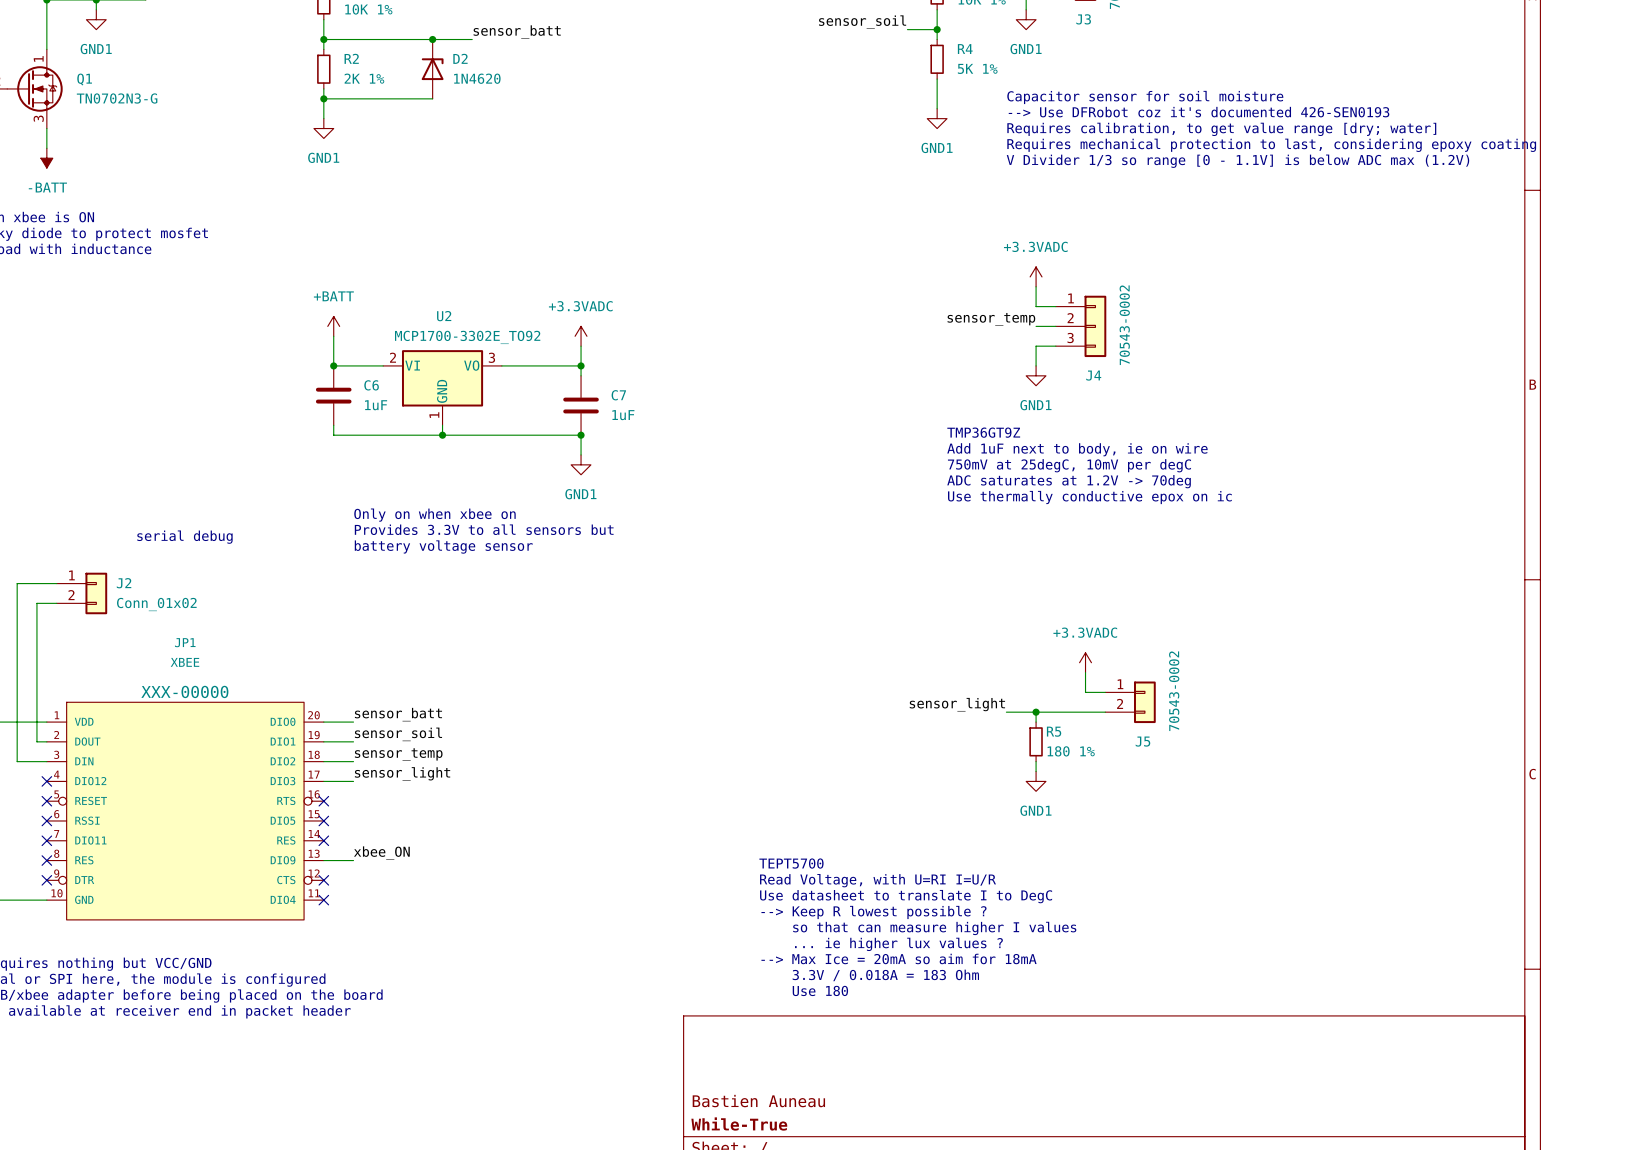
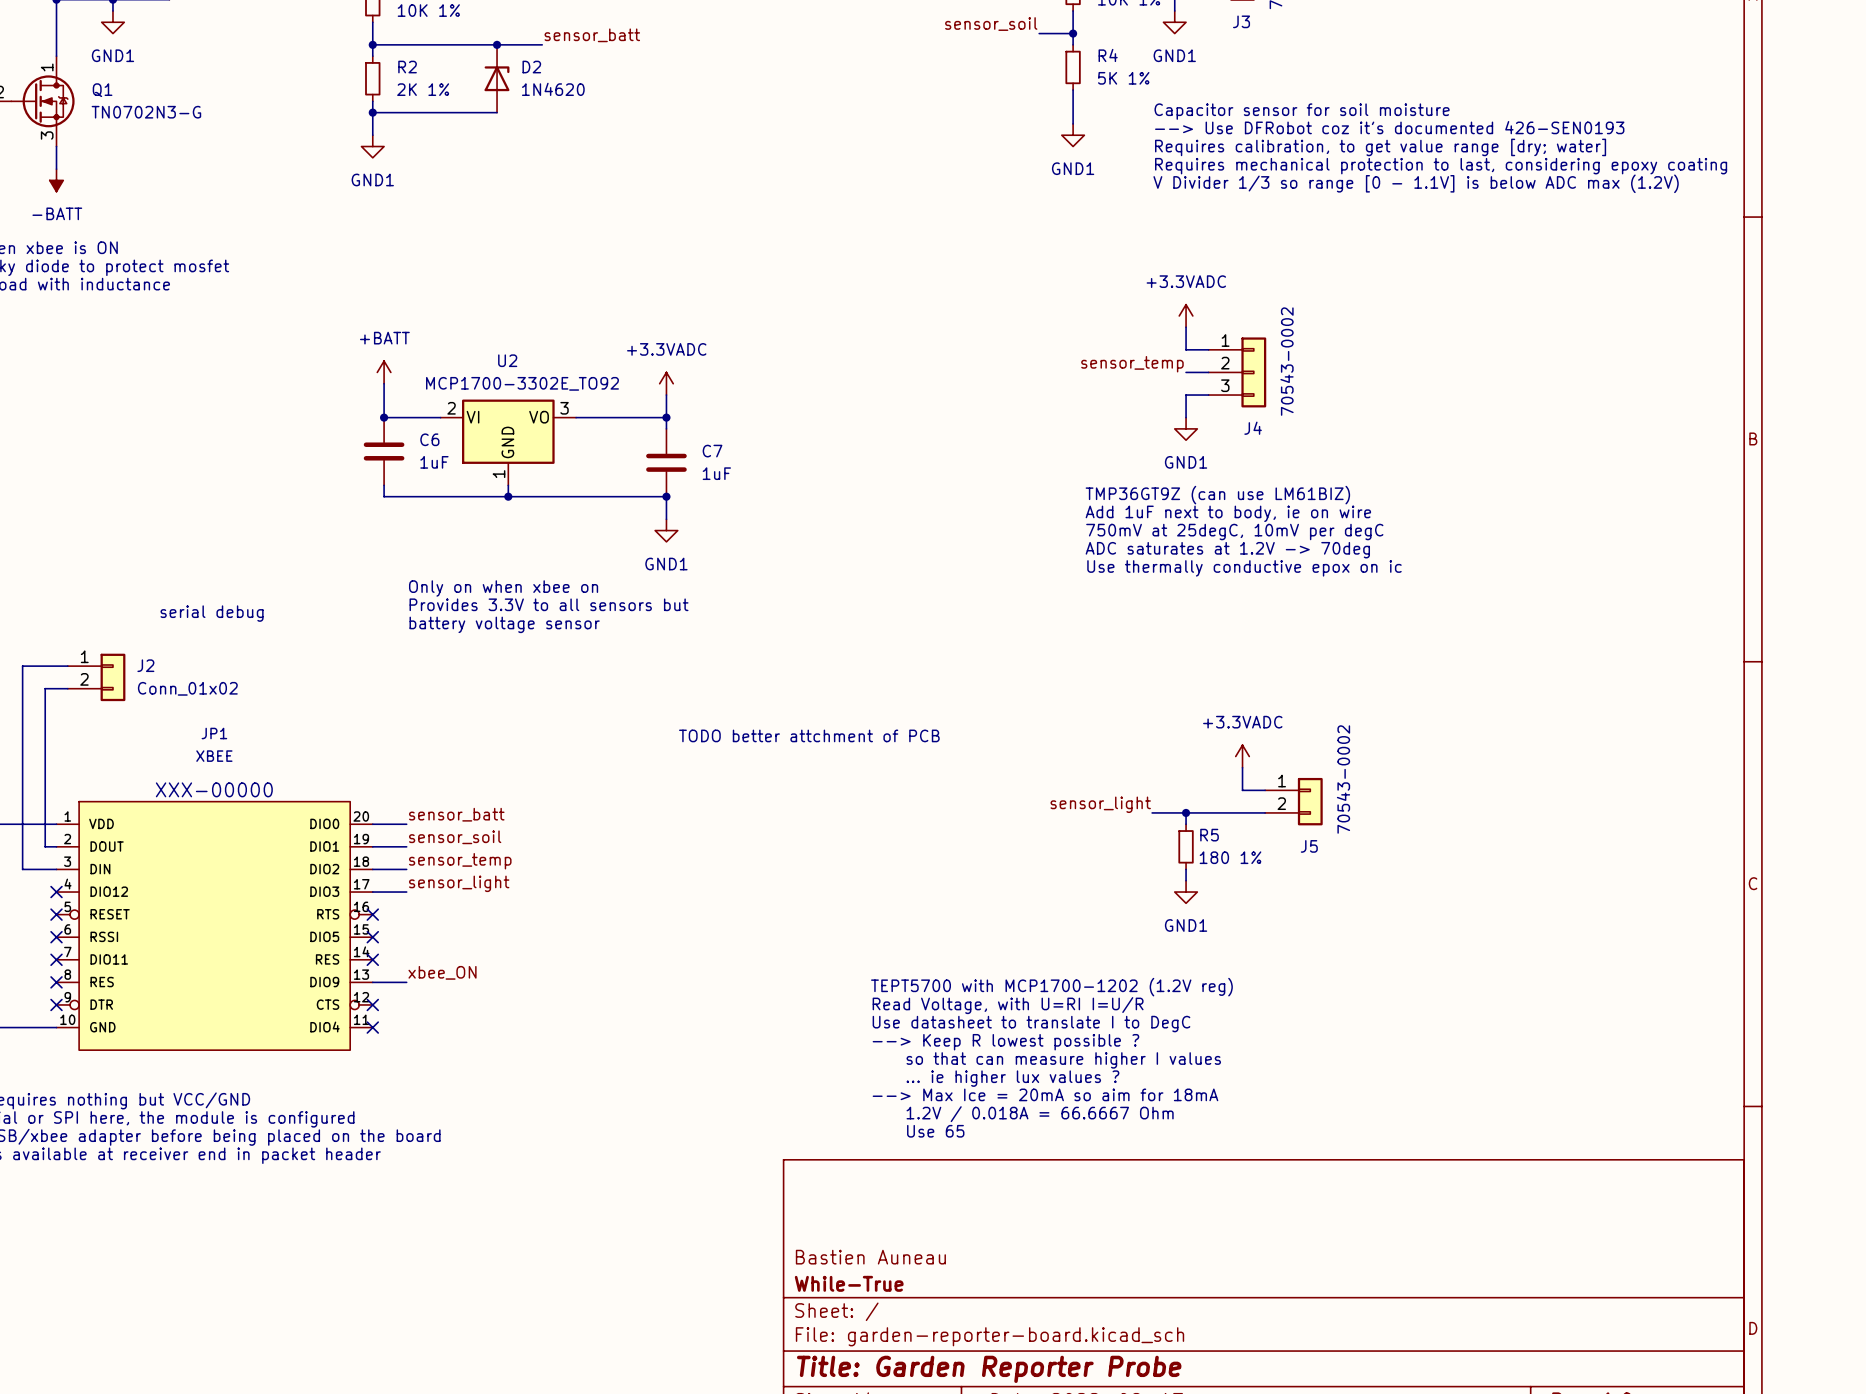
text: TMP36GT9Z (983, 432) -> TMP36GT9Z (can use LM61BIZ) (1217, 495)
text: none -> TODO better attchment of PCB (809, 735)
text: TEPT5700 (791, 863) -> TEPT5700 with MCP1700-1202 (1.2V reg) (1051, 987)
text: 3.3V / 0.018A = 183 Ohm (885, 975) -> 1.2V / 0.018A = 66.6667 Ohm (1040, 1114)
text: Use 180 (820, 990) -> Use 65 (935, 1131)

